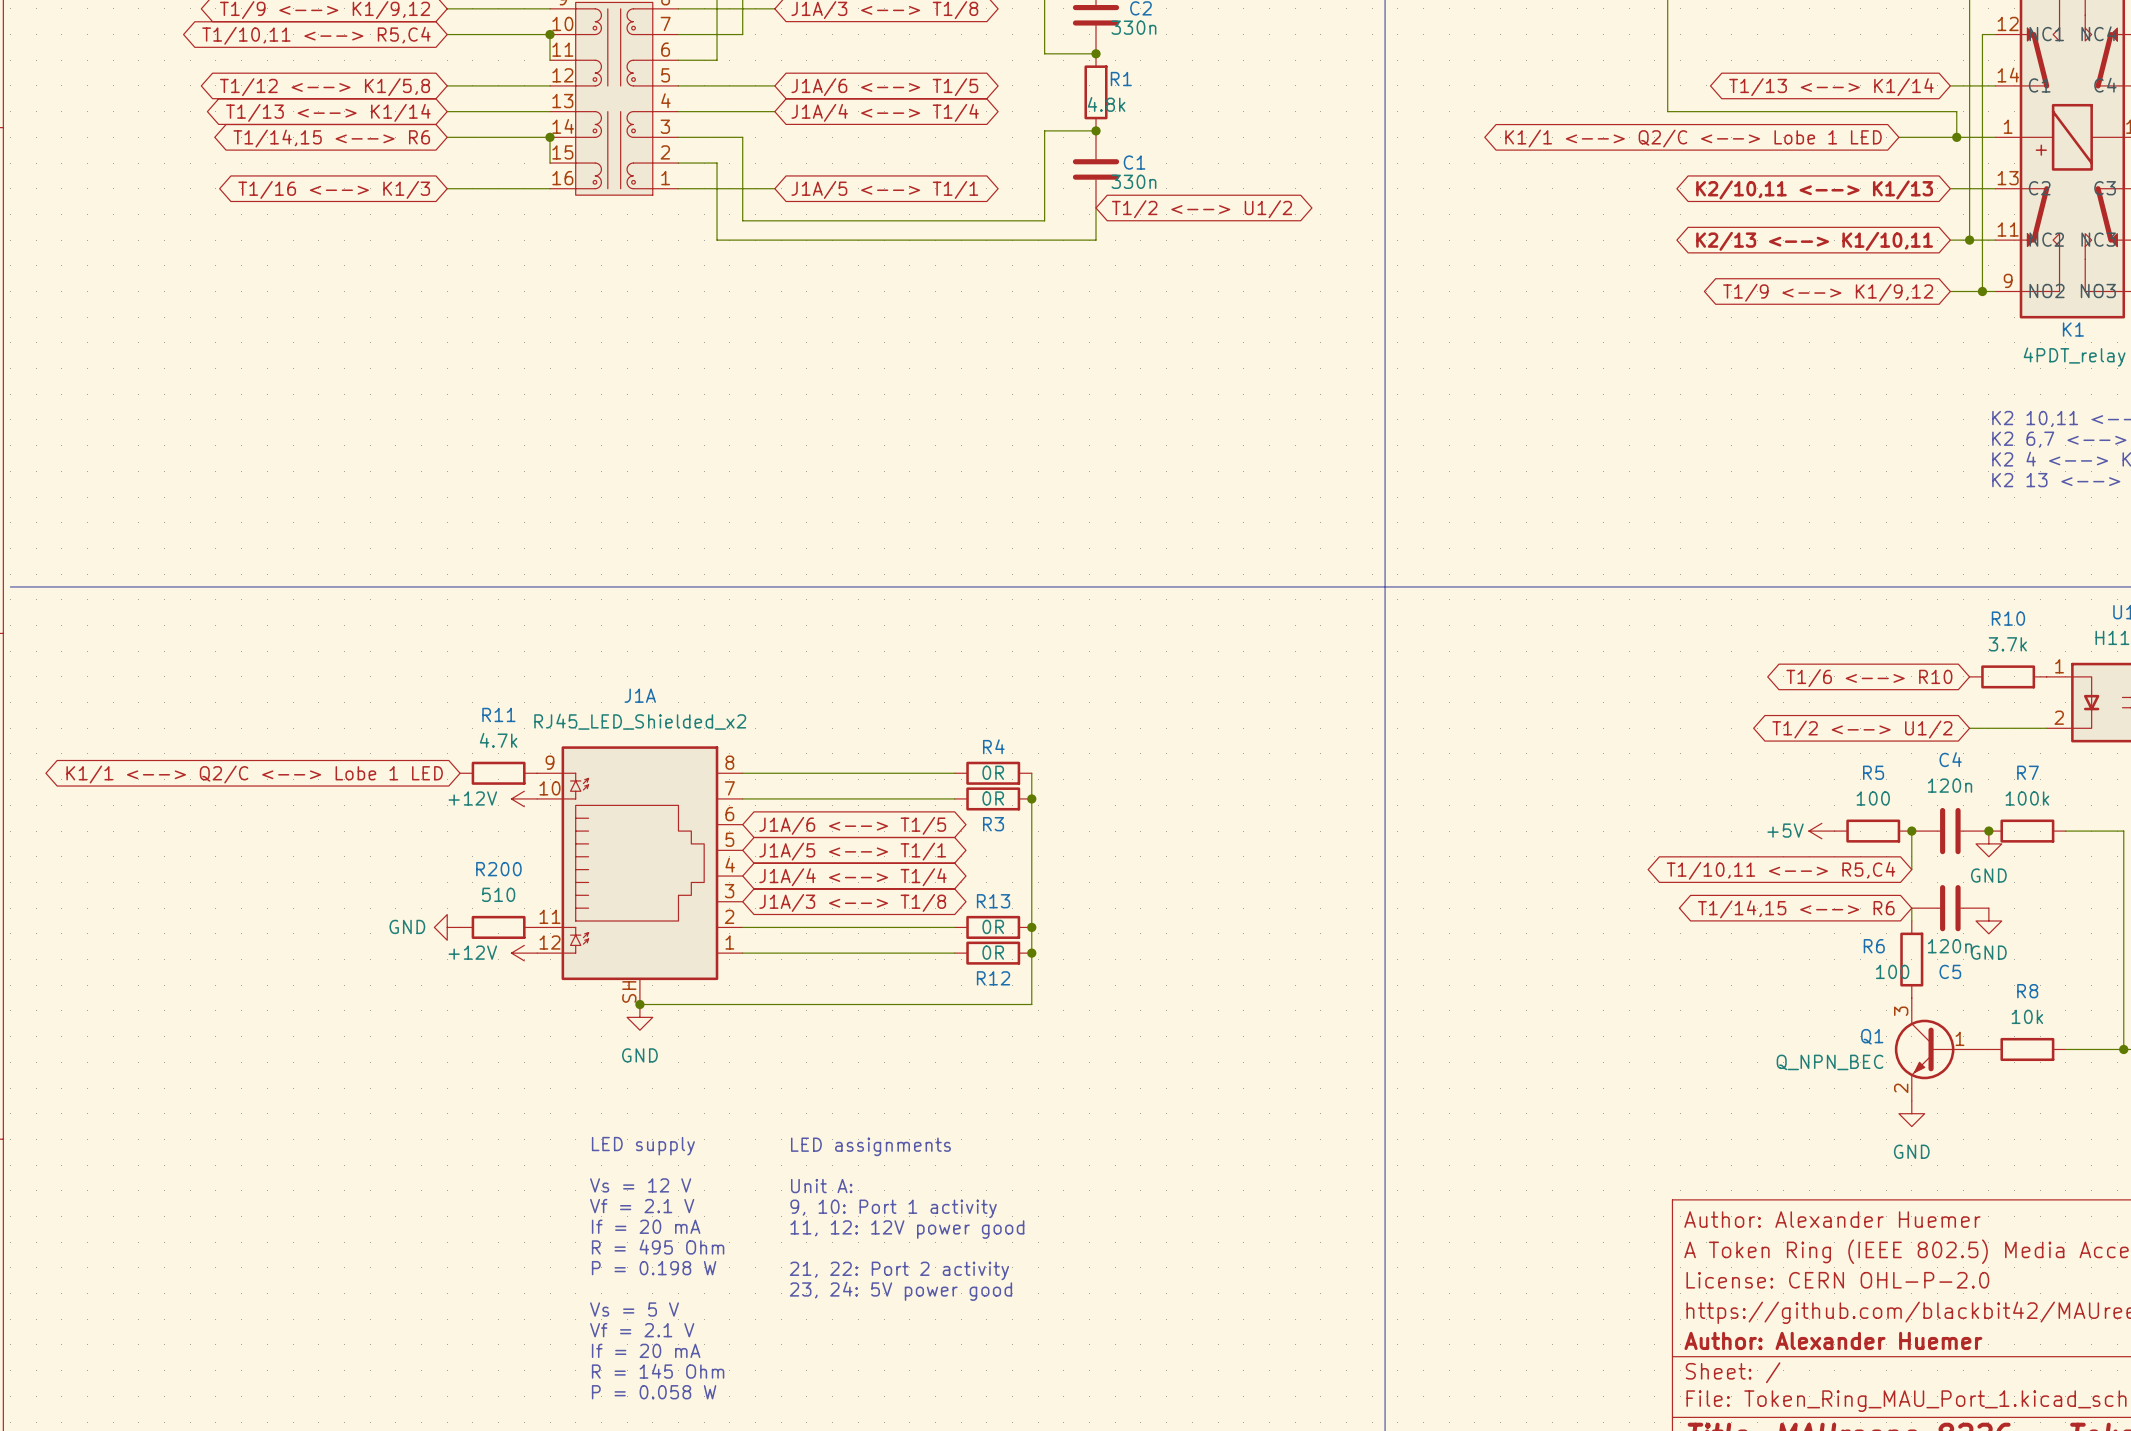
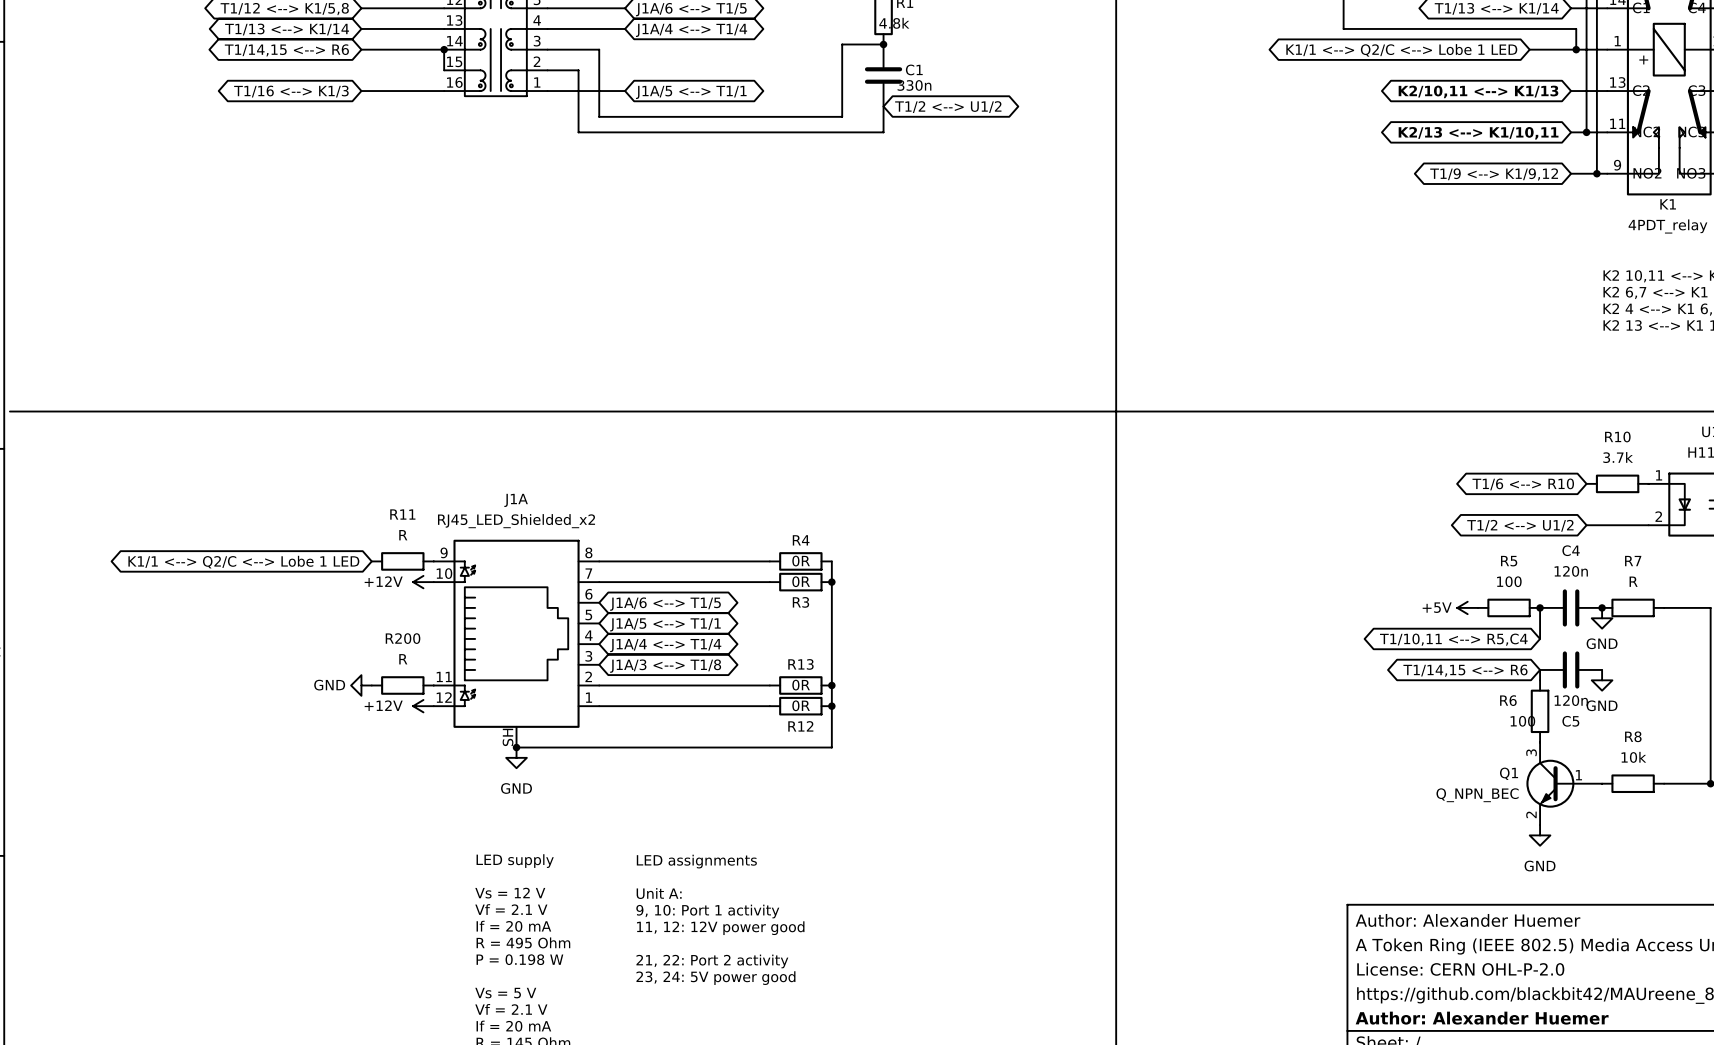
R11 value: 4.7k (498, 740) -> R (403, 535)
R7 value: 100k (2027, 798) -> R (1633, 581)
R200 value: 510 (498, 894) -> R (403, 659)

